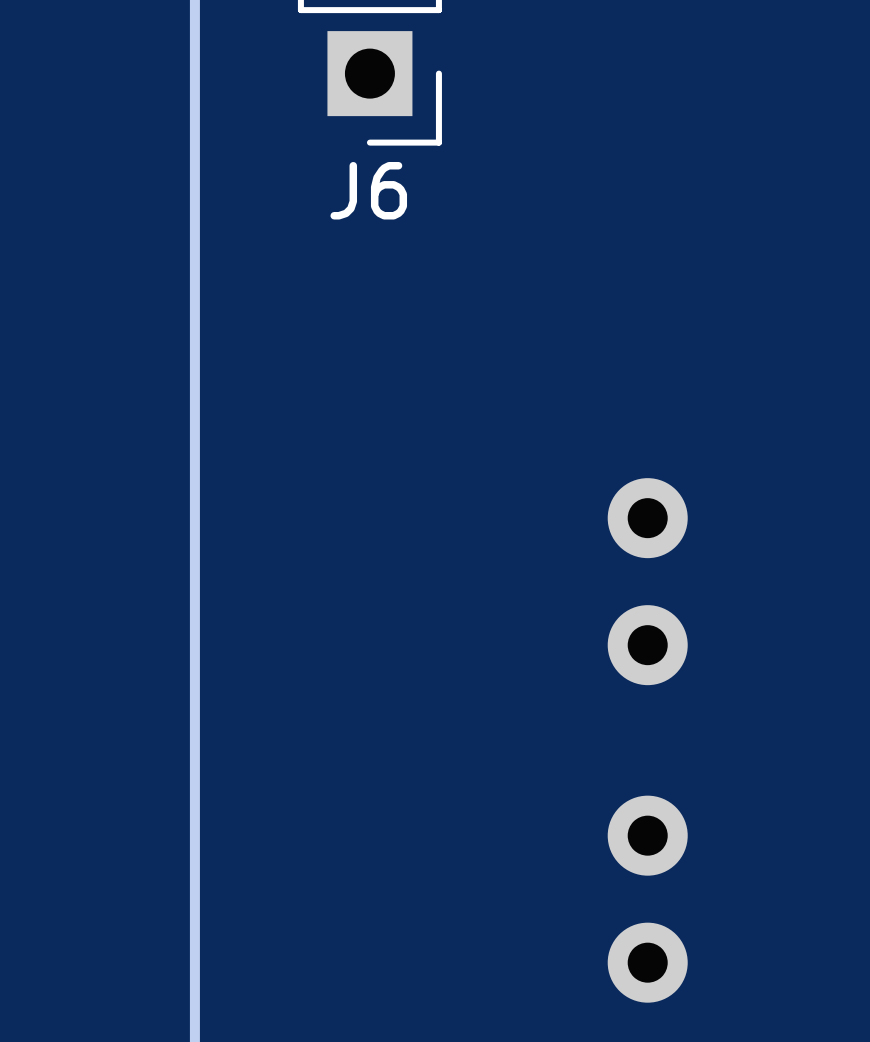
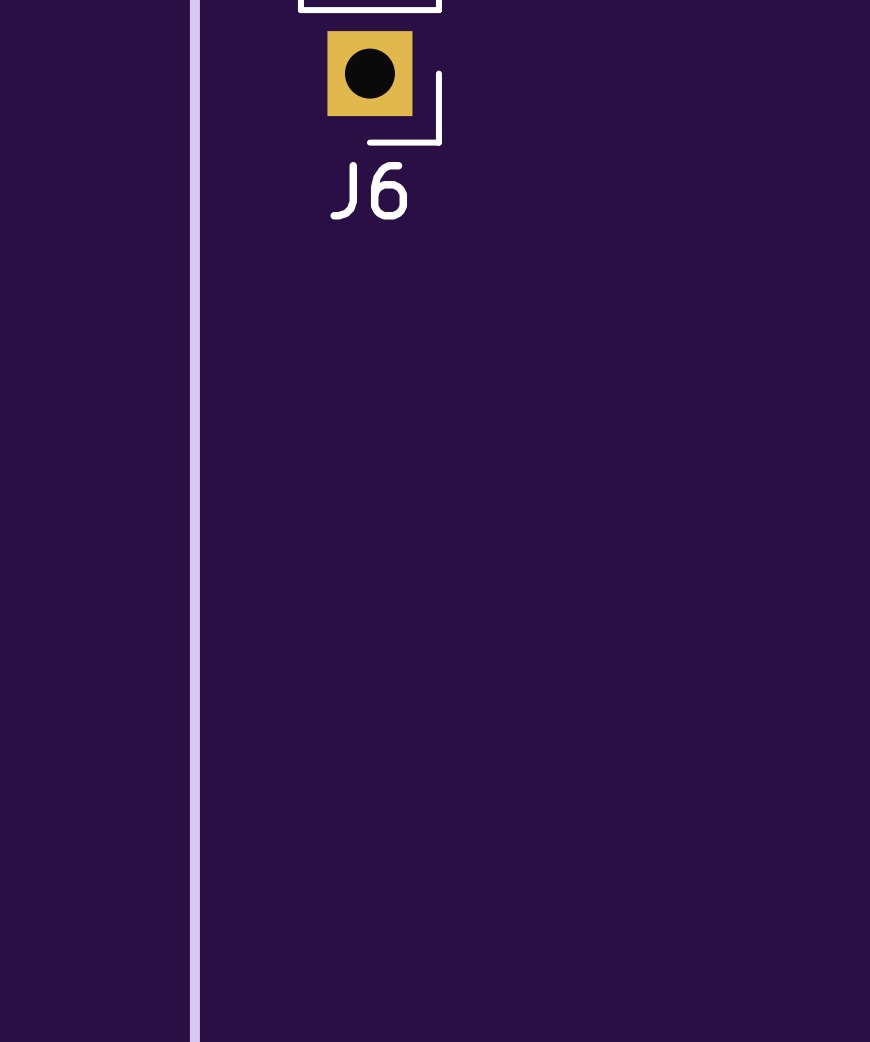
part: (647, 581) -> none
part: (647, 899) -> none

